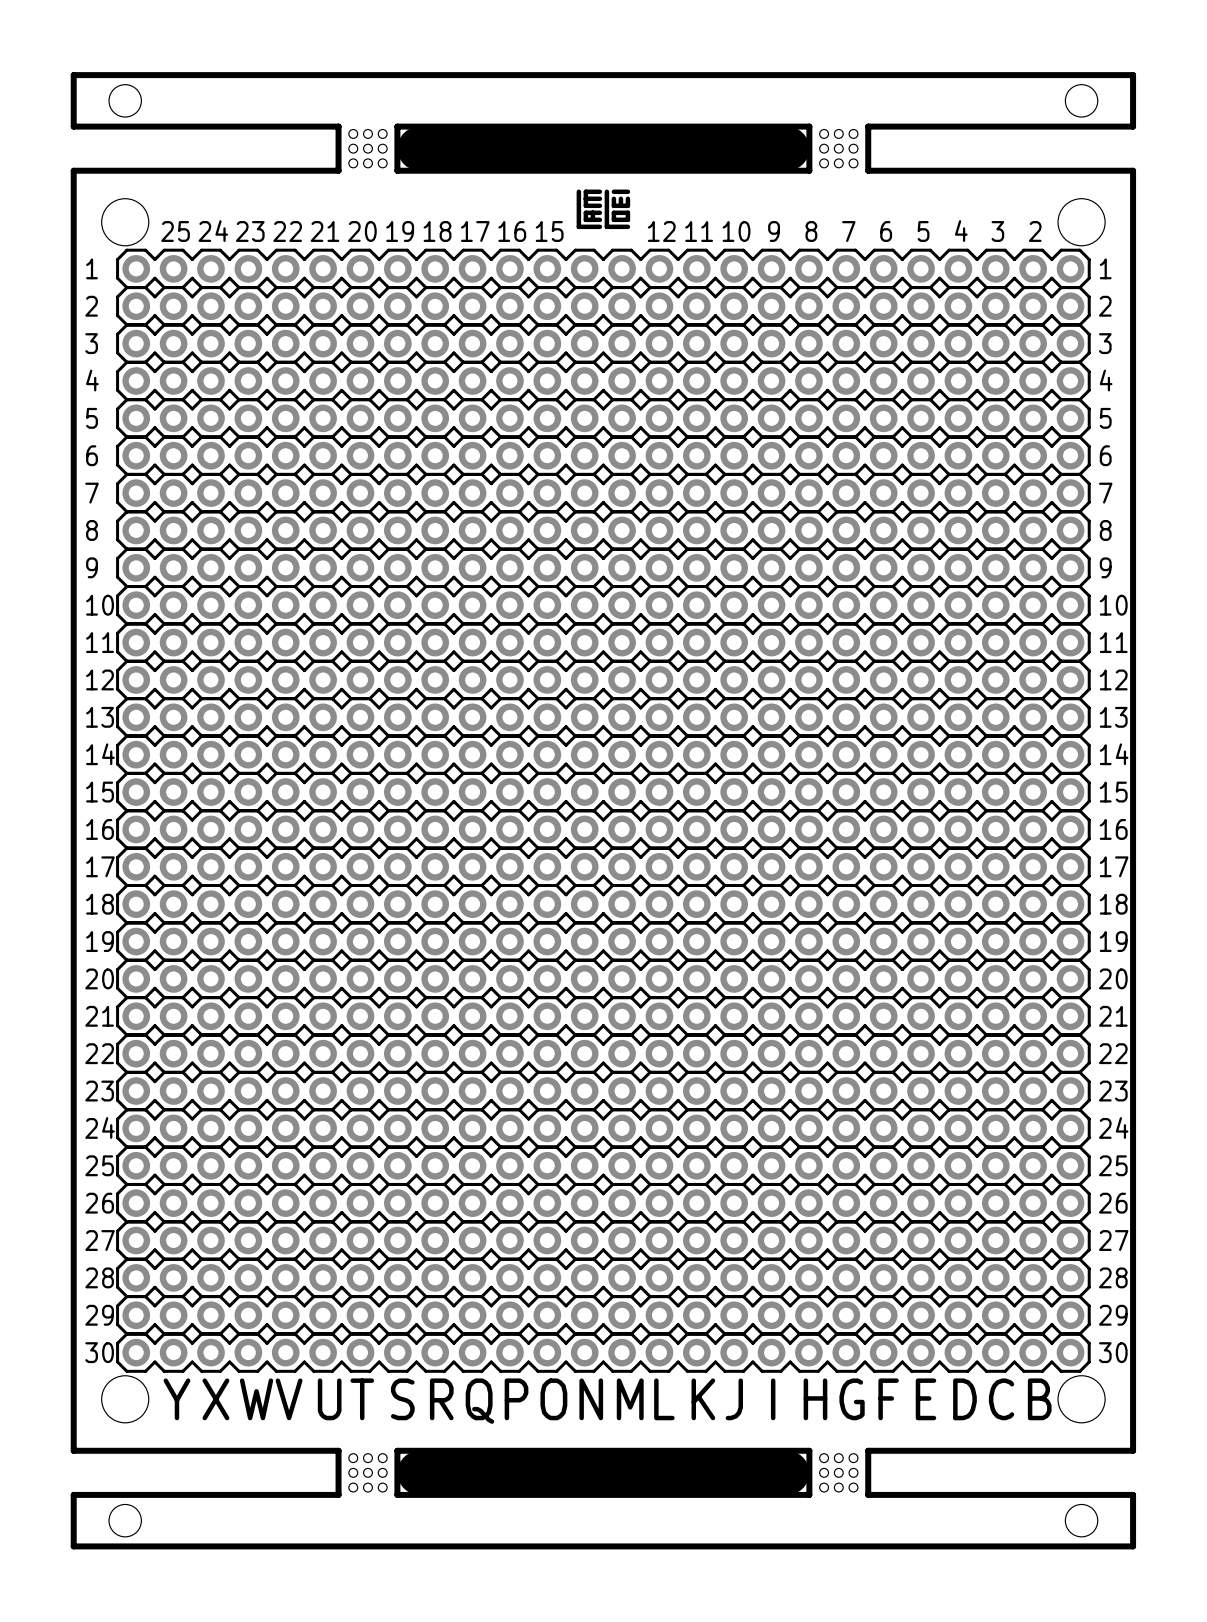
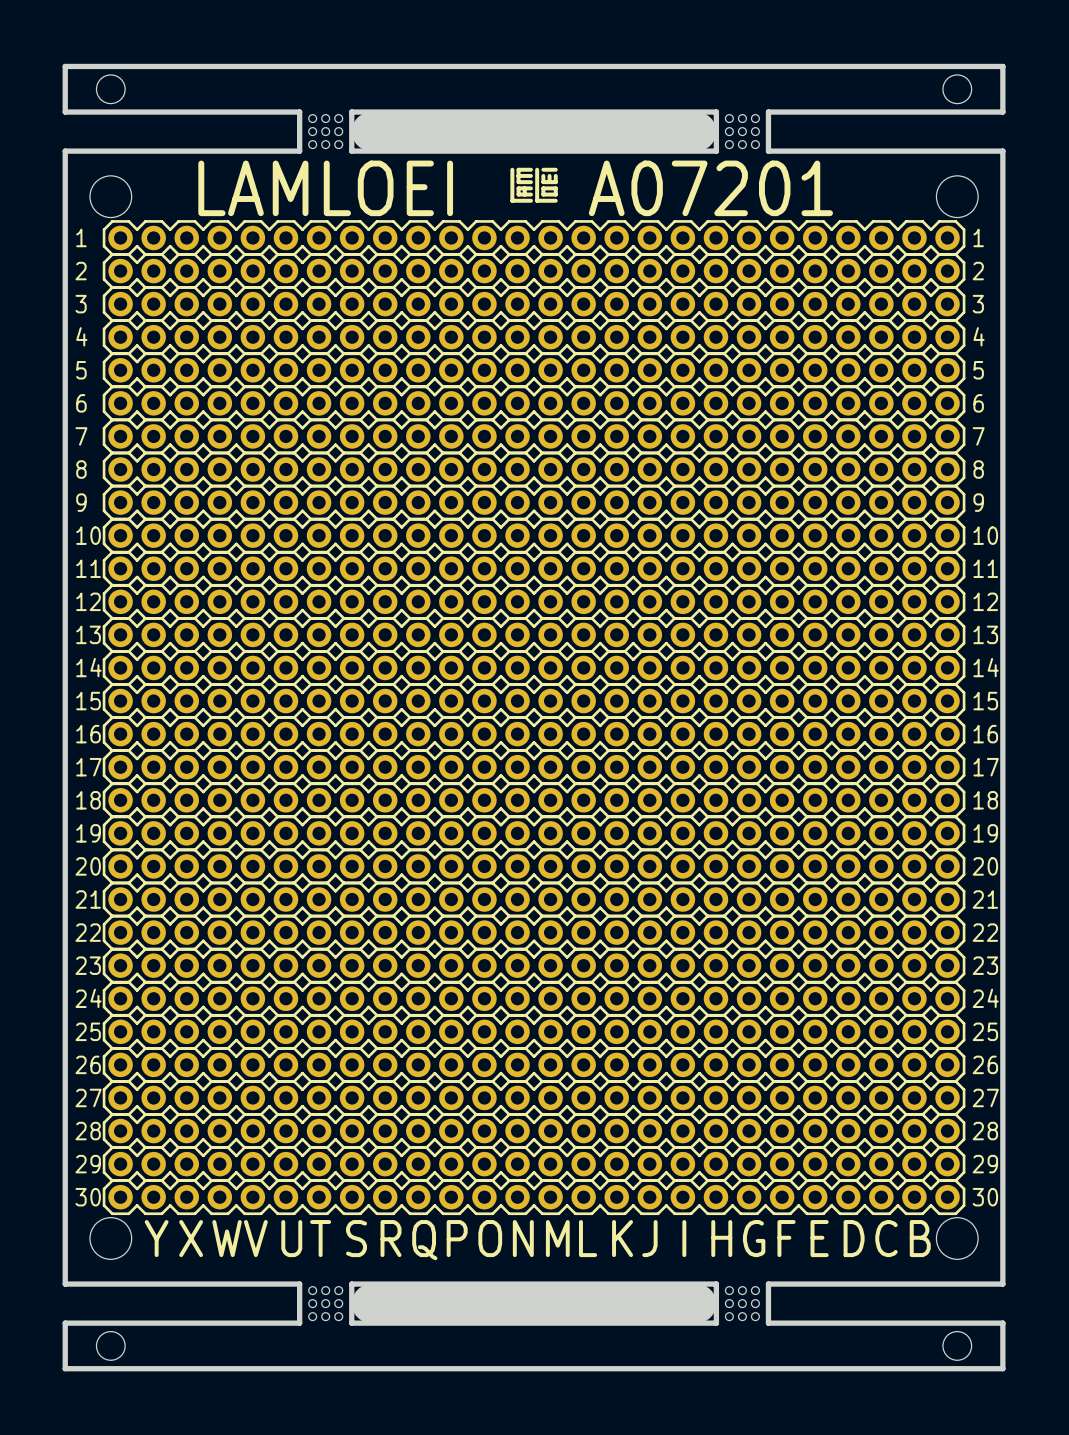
text: none -> LAMLOEI (325, 188)
text: none -> A07201 (710, 188)
text: 25 (175, 231) -> none
text: 24 (213, 231) -> none
text: 23 (250, 231) -> none
text: 22 (287, 231) -> none
text: 21 (325, 231) -> none
text: 20 (362, 231) -> none
text: 19 (400, 231) -> none
text: 18 (437, 231) -> none
text: 17 (475, 231) -> none
text: 16 (512, 231) -> none
text: 15 (549, 231) -> none
text: 12 (661, 231) -> none
text: 11 (699, 231) -> none
text: 10 (736, 231) -> none
text: 9 (774, 231) -> none
text: 8 (811, 231) -> none
text: 7 (848, 231) -> none
text: 6 (886, 231) -> none
text: 5 (923, 231) -> none
text: 4 (961, 231) -> none
text: 3 (997, 231) -> none
text: 2 (1035, 231) -> none

